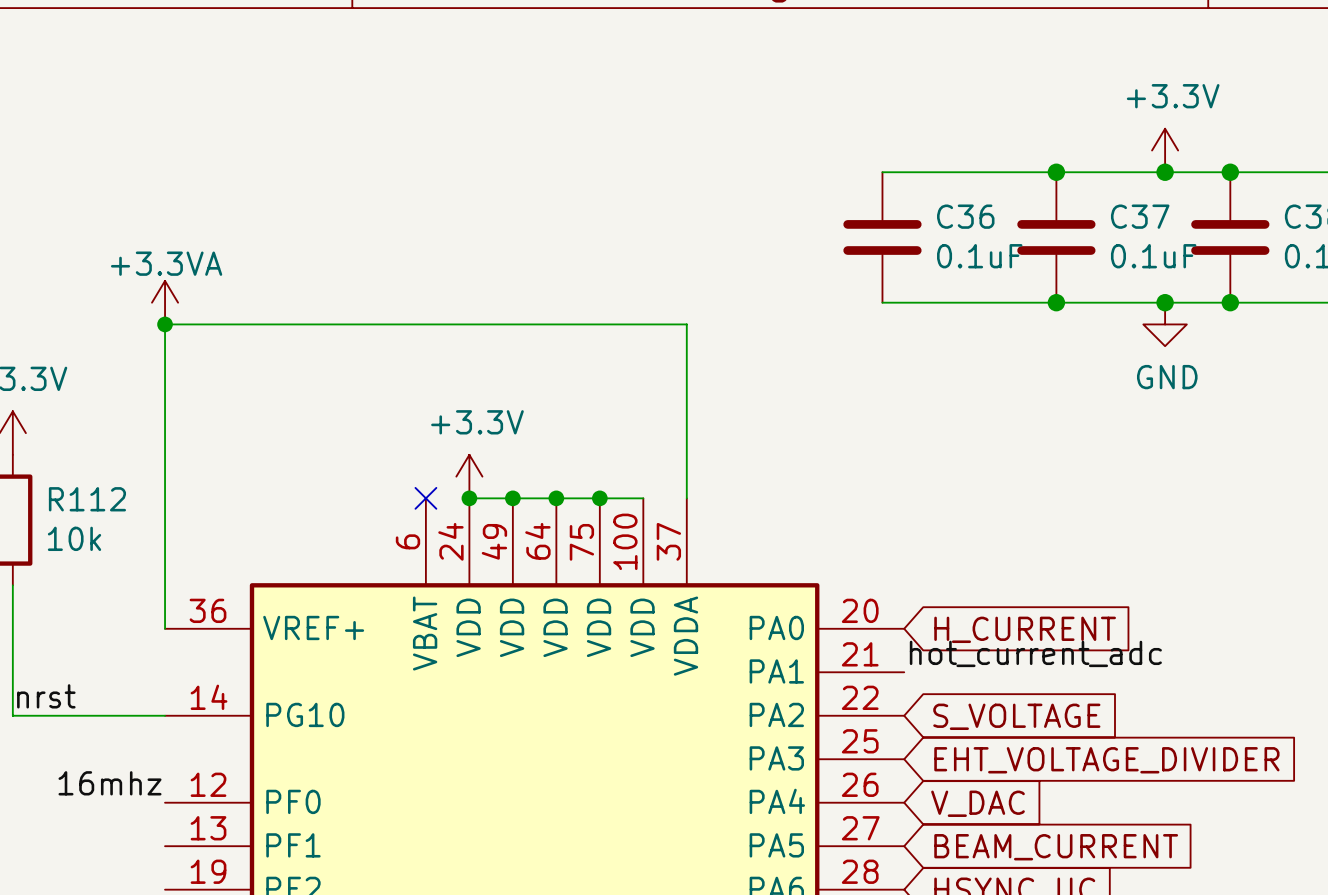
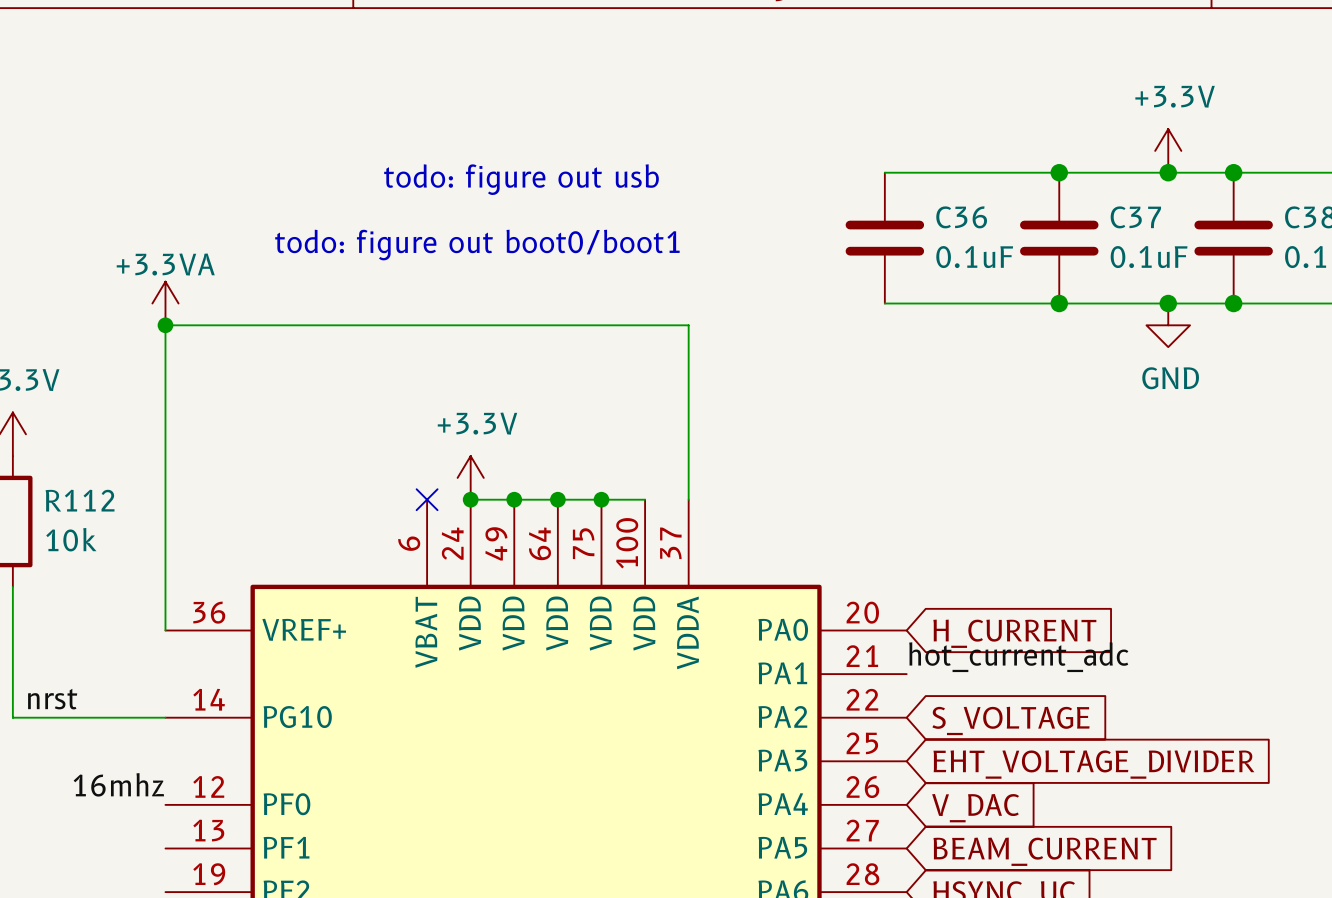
text: none -> todo: figure out usb (521, 179)
text: none -> todo: figure out boot0/boot1 (477, 245)

